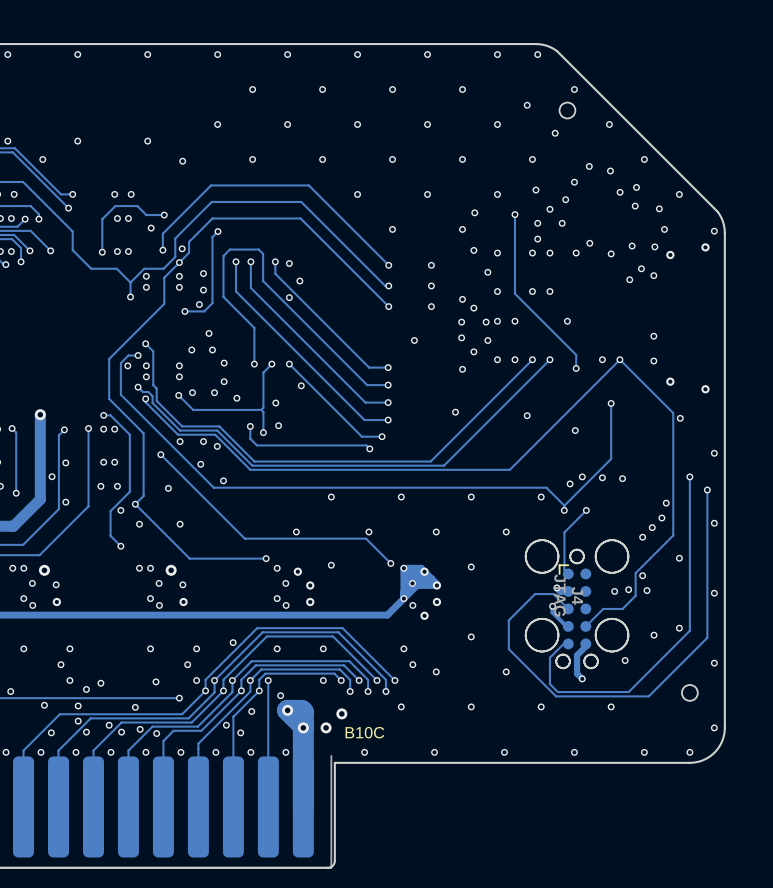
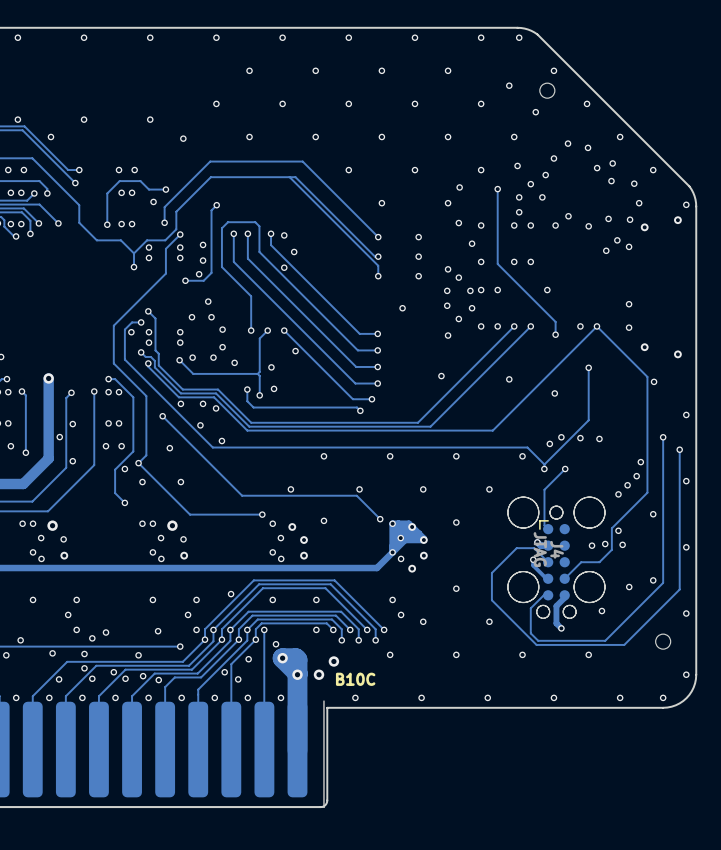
via: (182, 248) -> none
track: (179, 262) (189, 252) (189, 241) (212, 218) (300, 218) (388, 306) -> (289, 177) (378, 265) (378, 276)

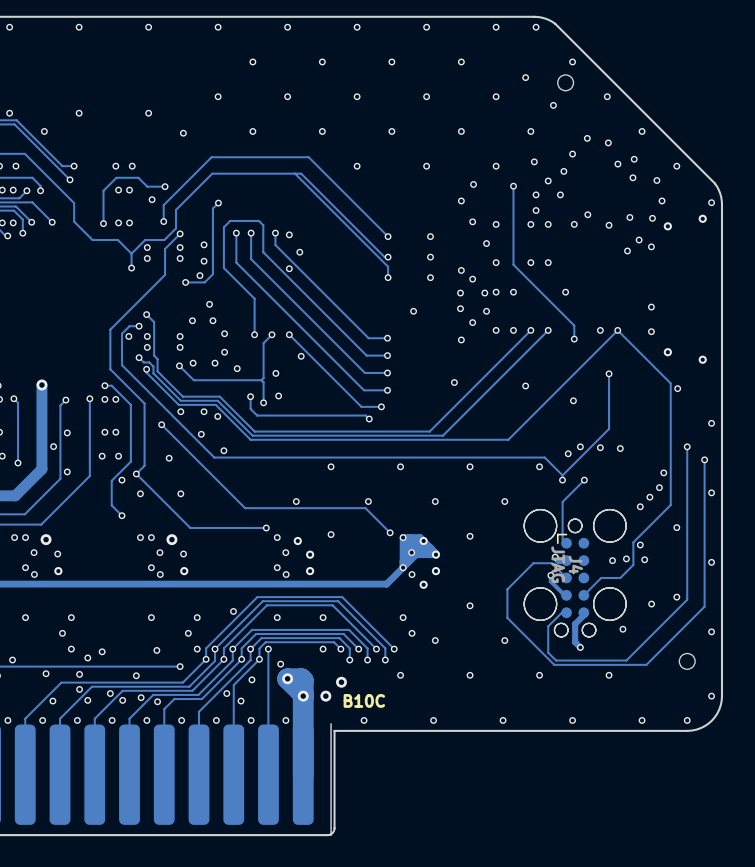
via: (381, 203) -> none

